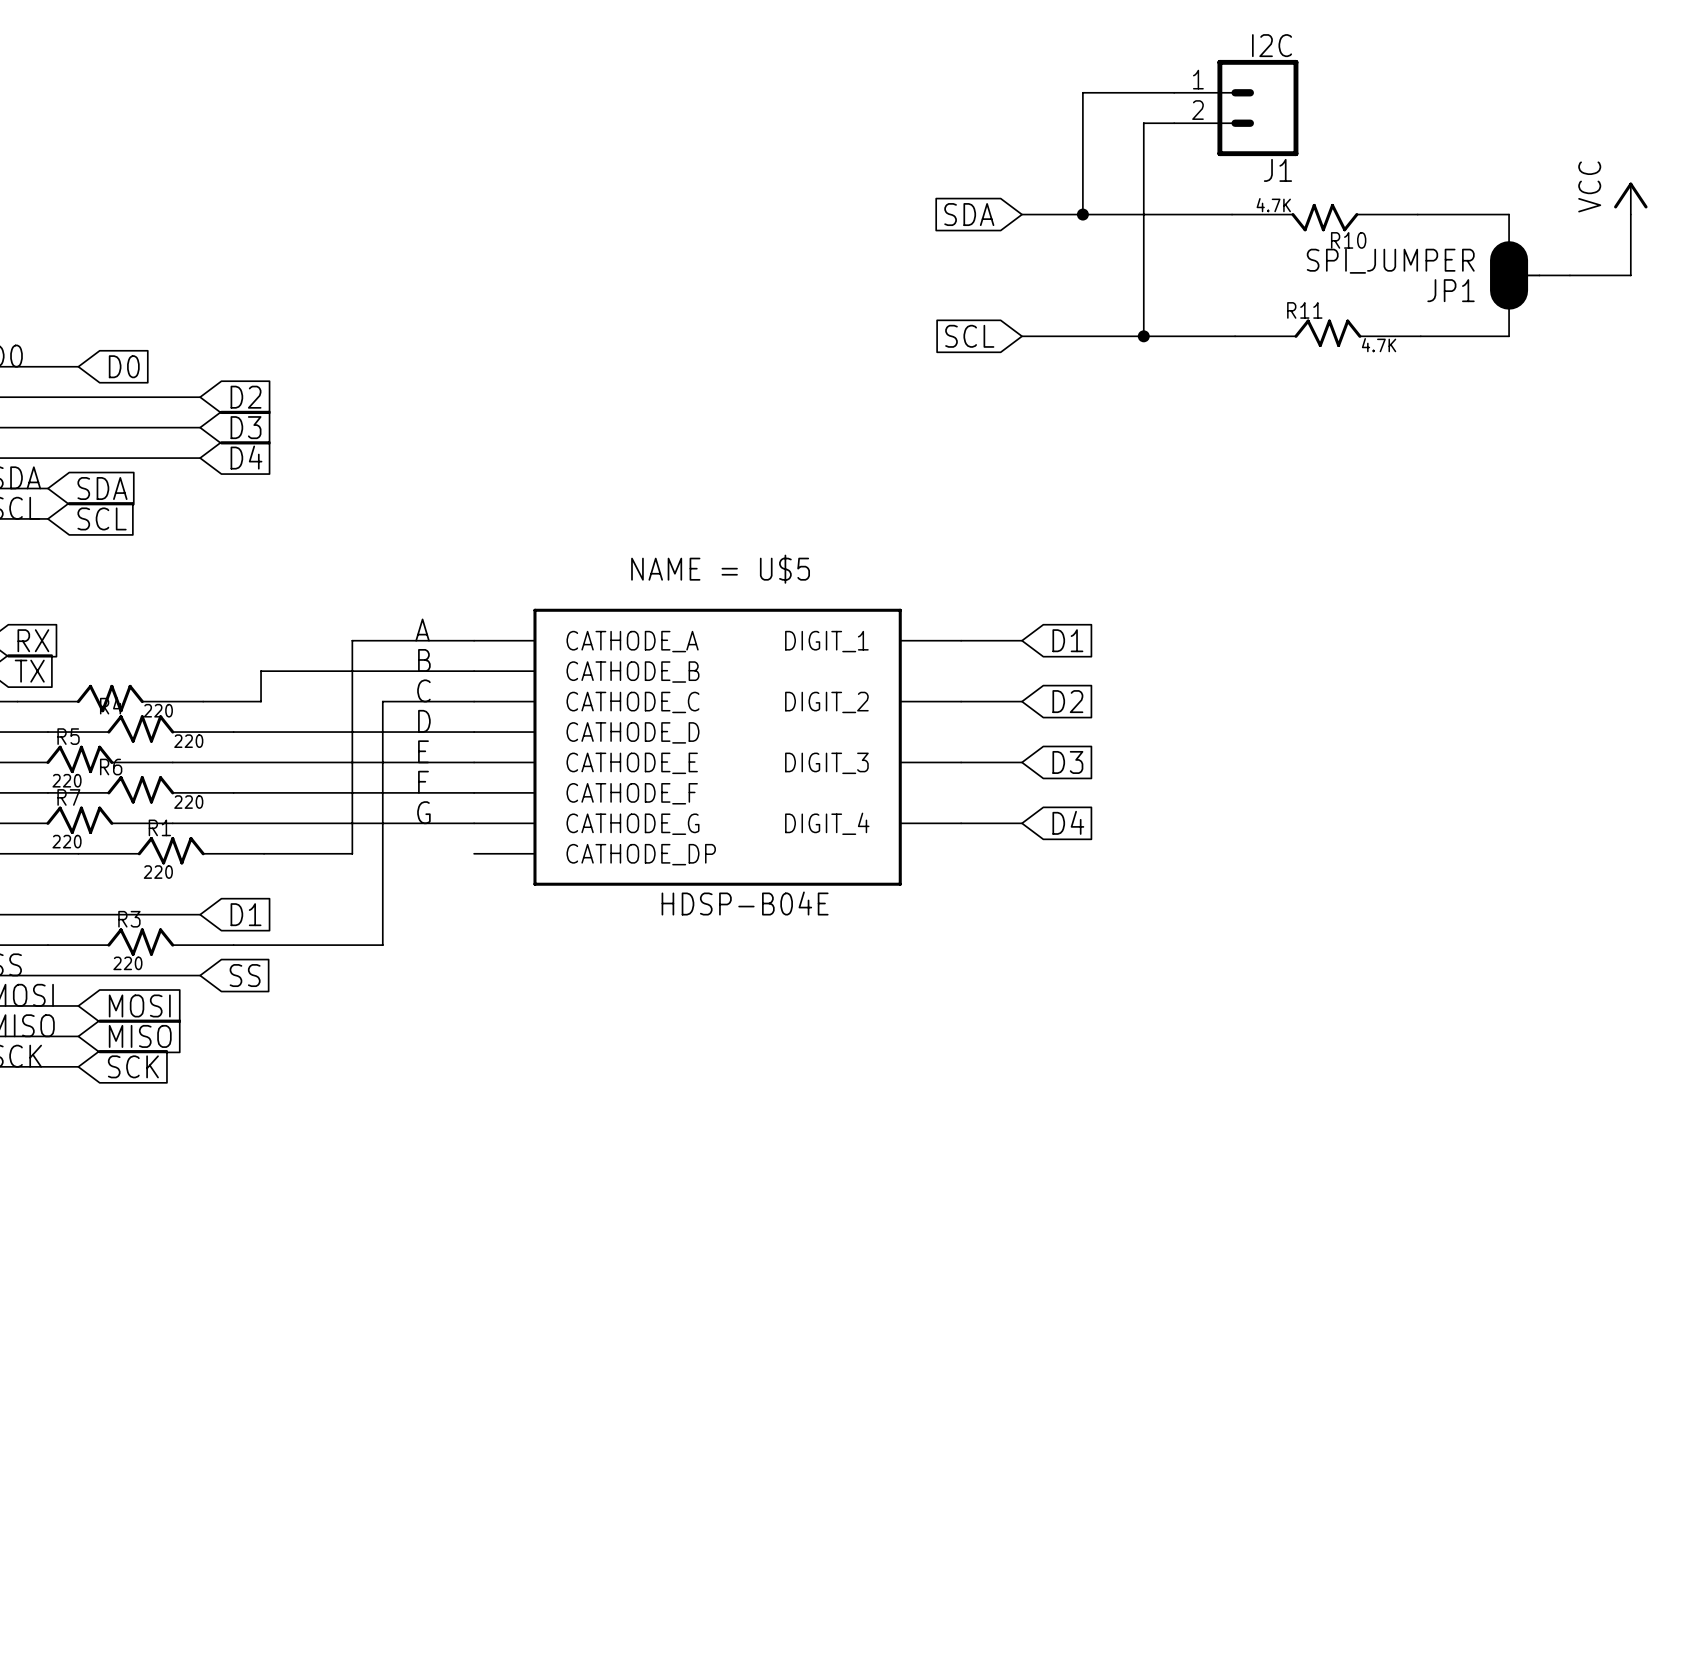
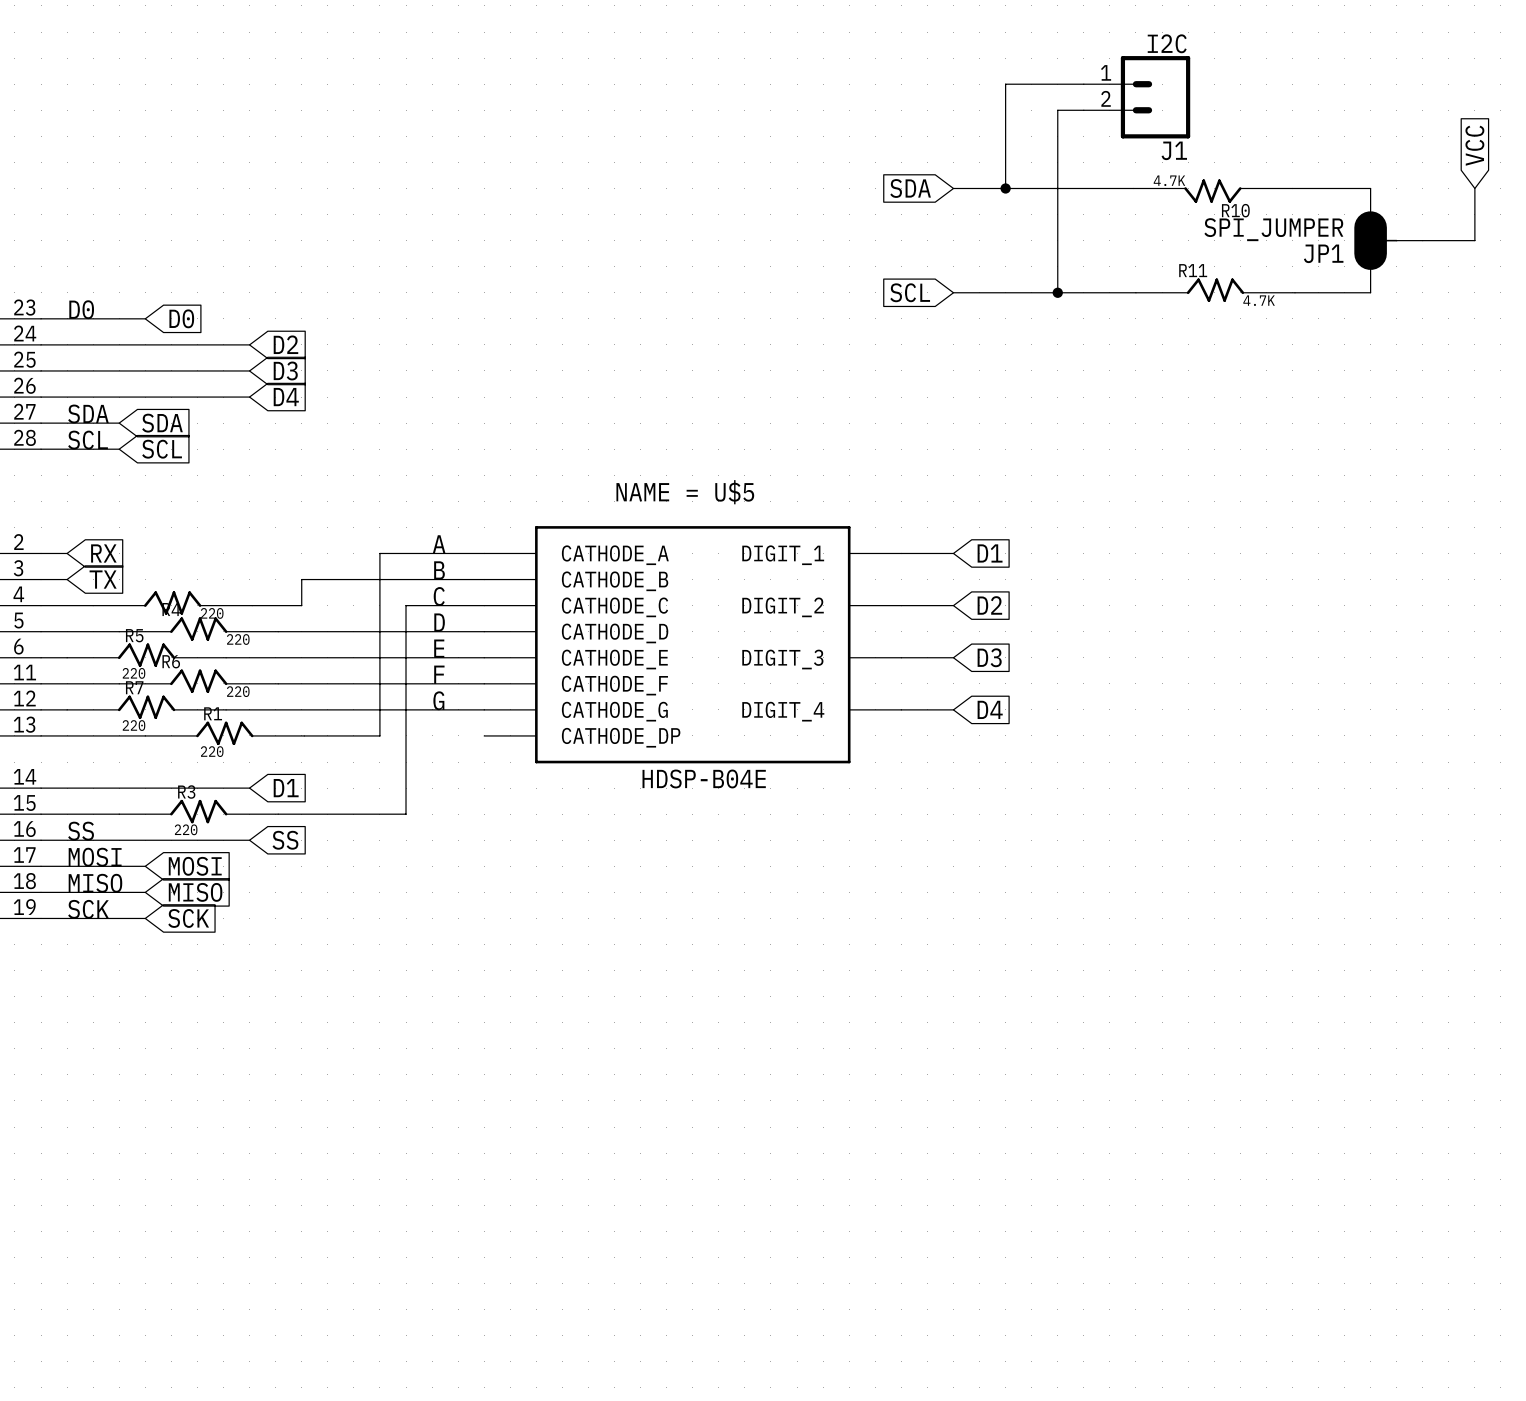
global label: none -> VCC (1474, 145)
power symbol: VCC (1630, 198) -> none

